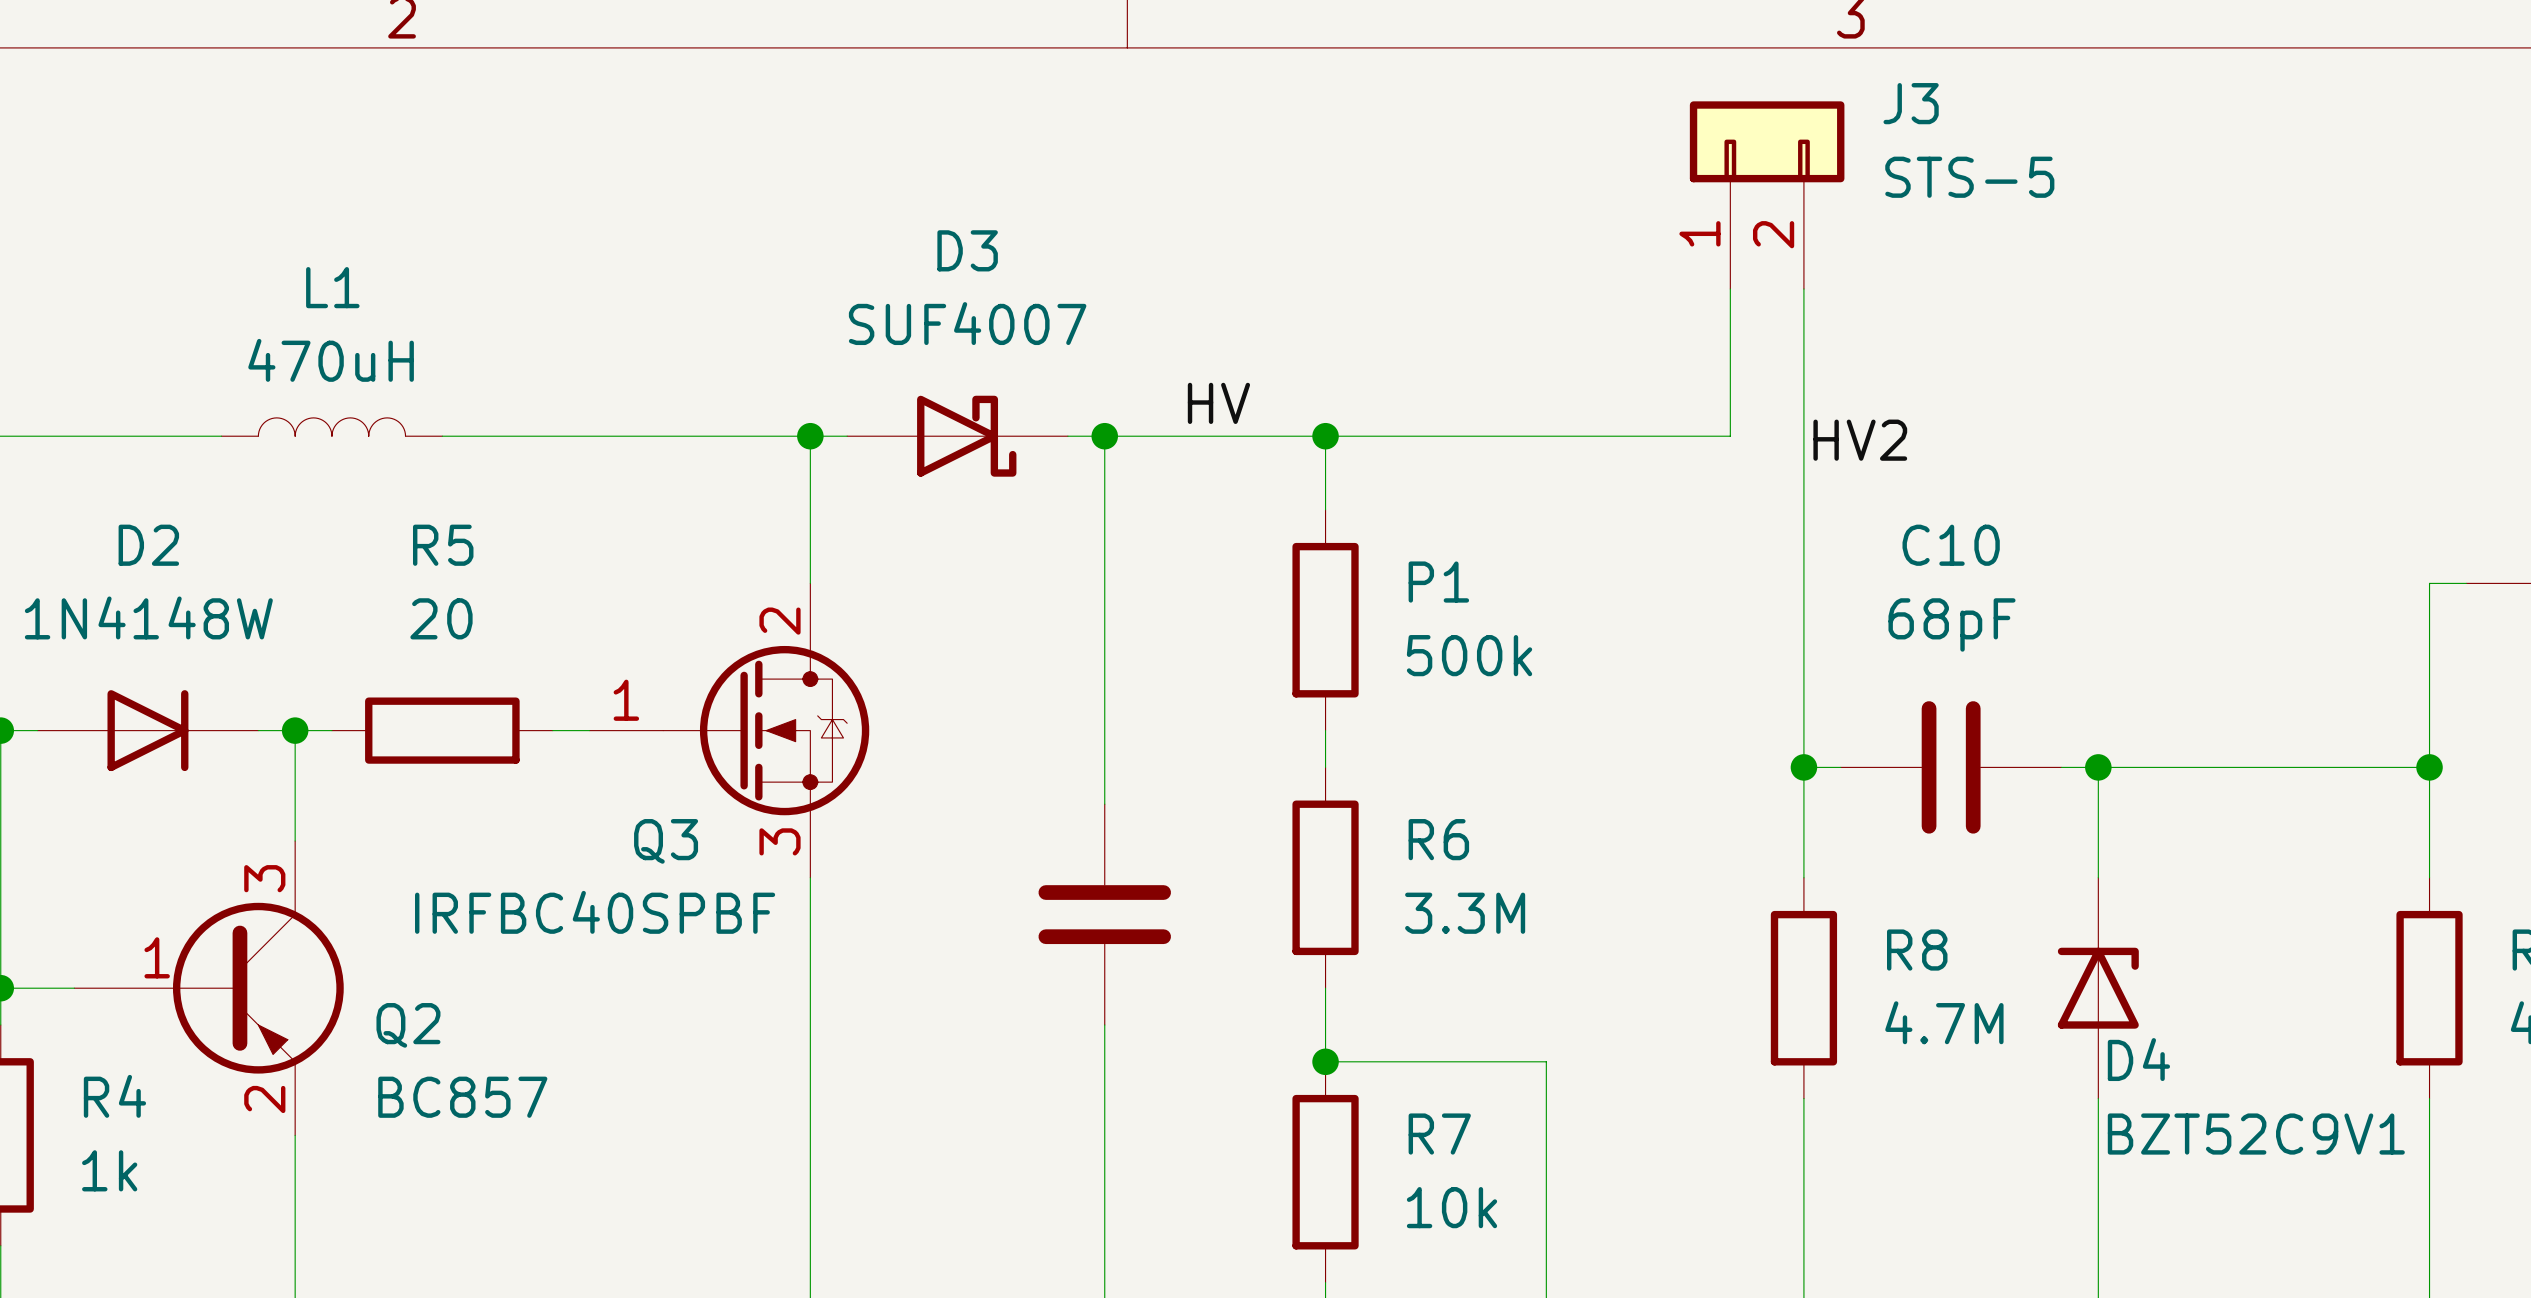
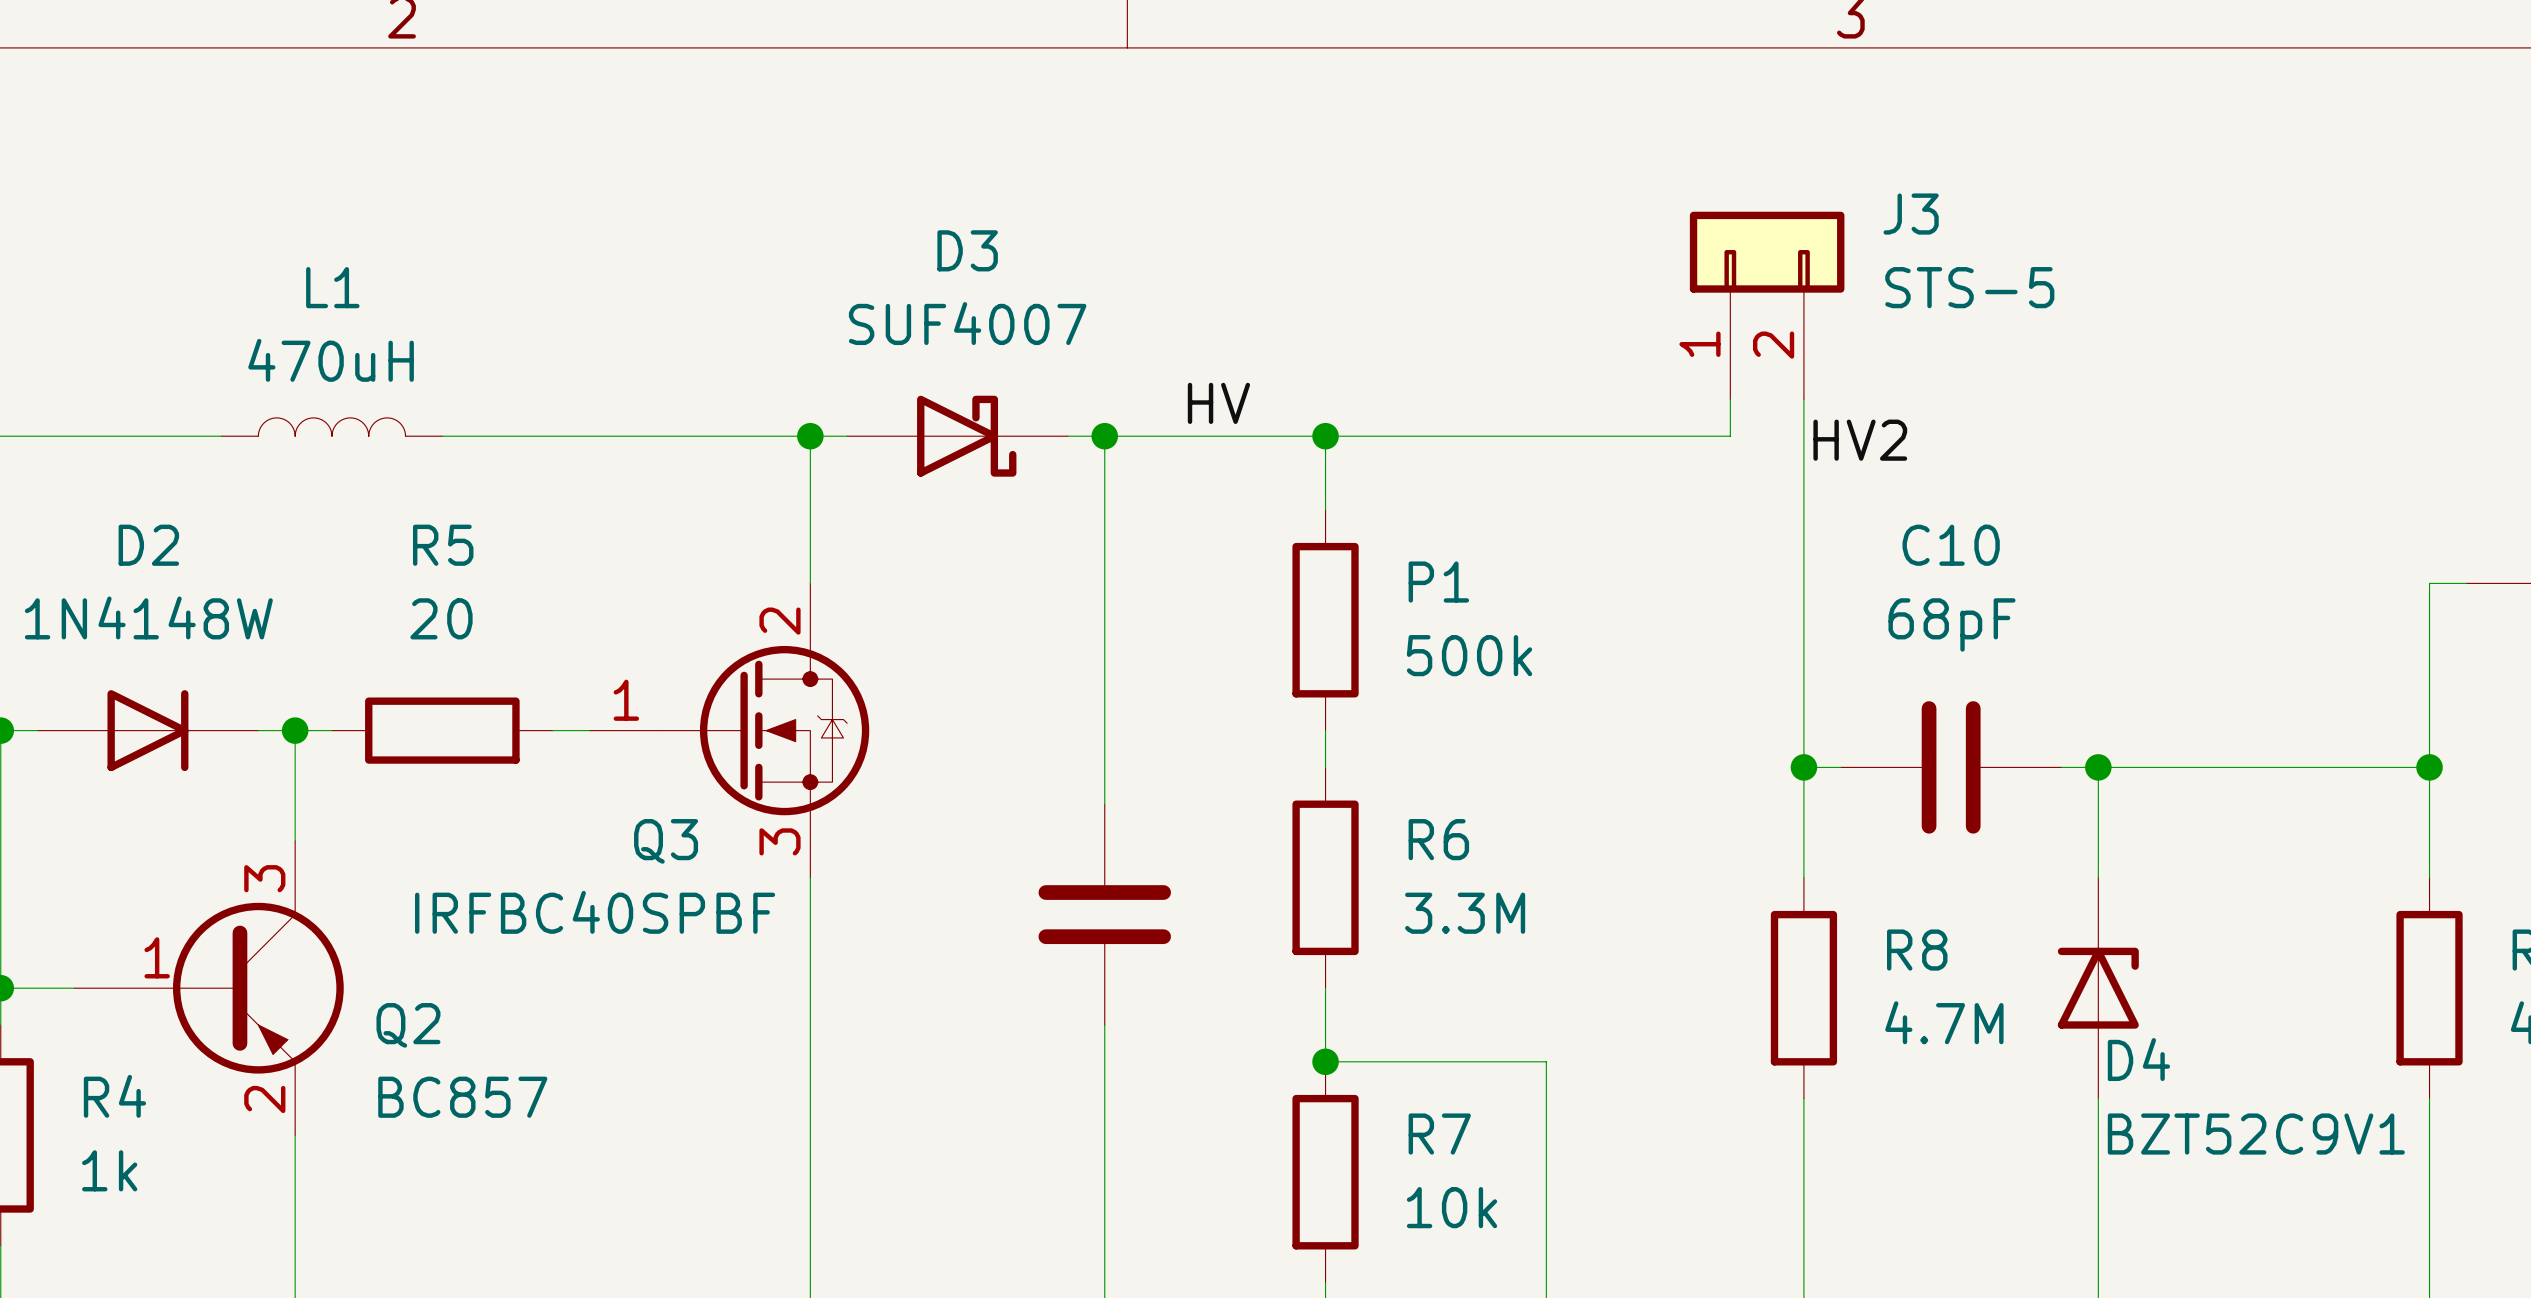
J3 position: (1767, 195) -> (1767, 305)

